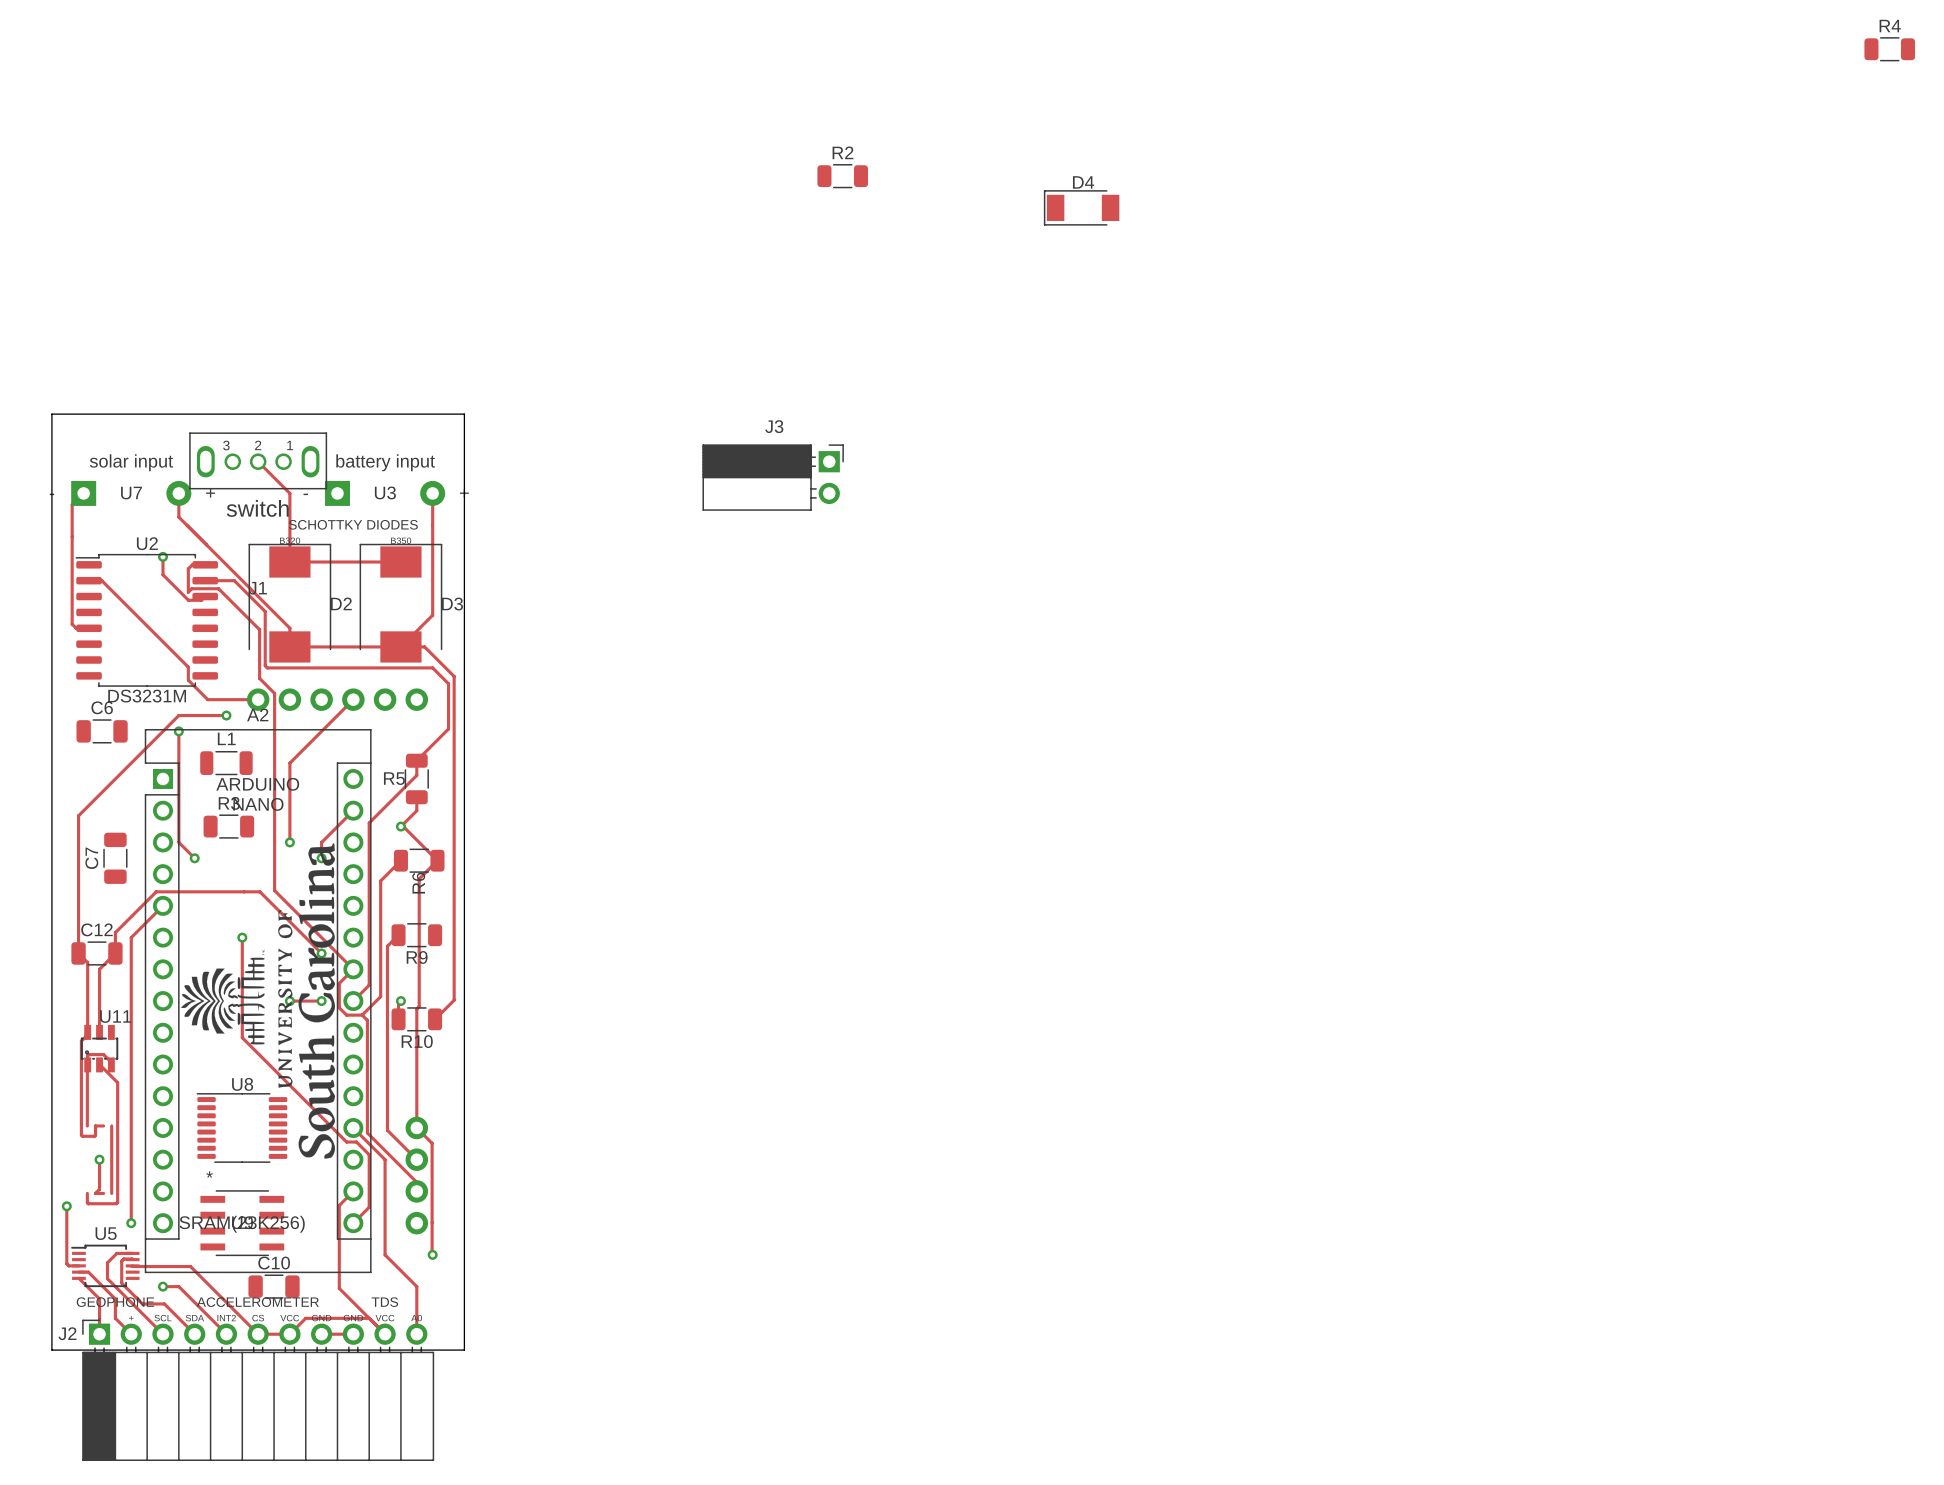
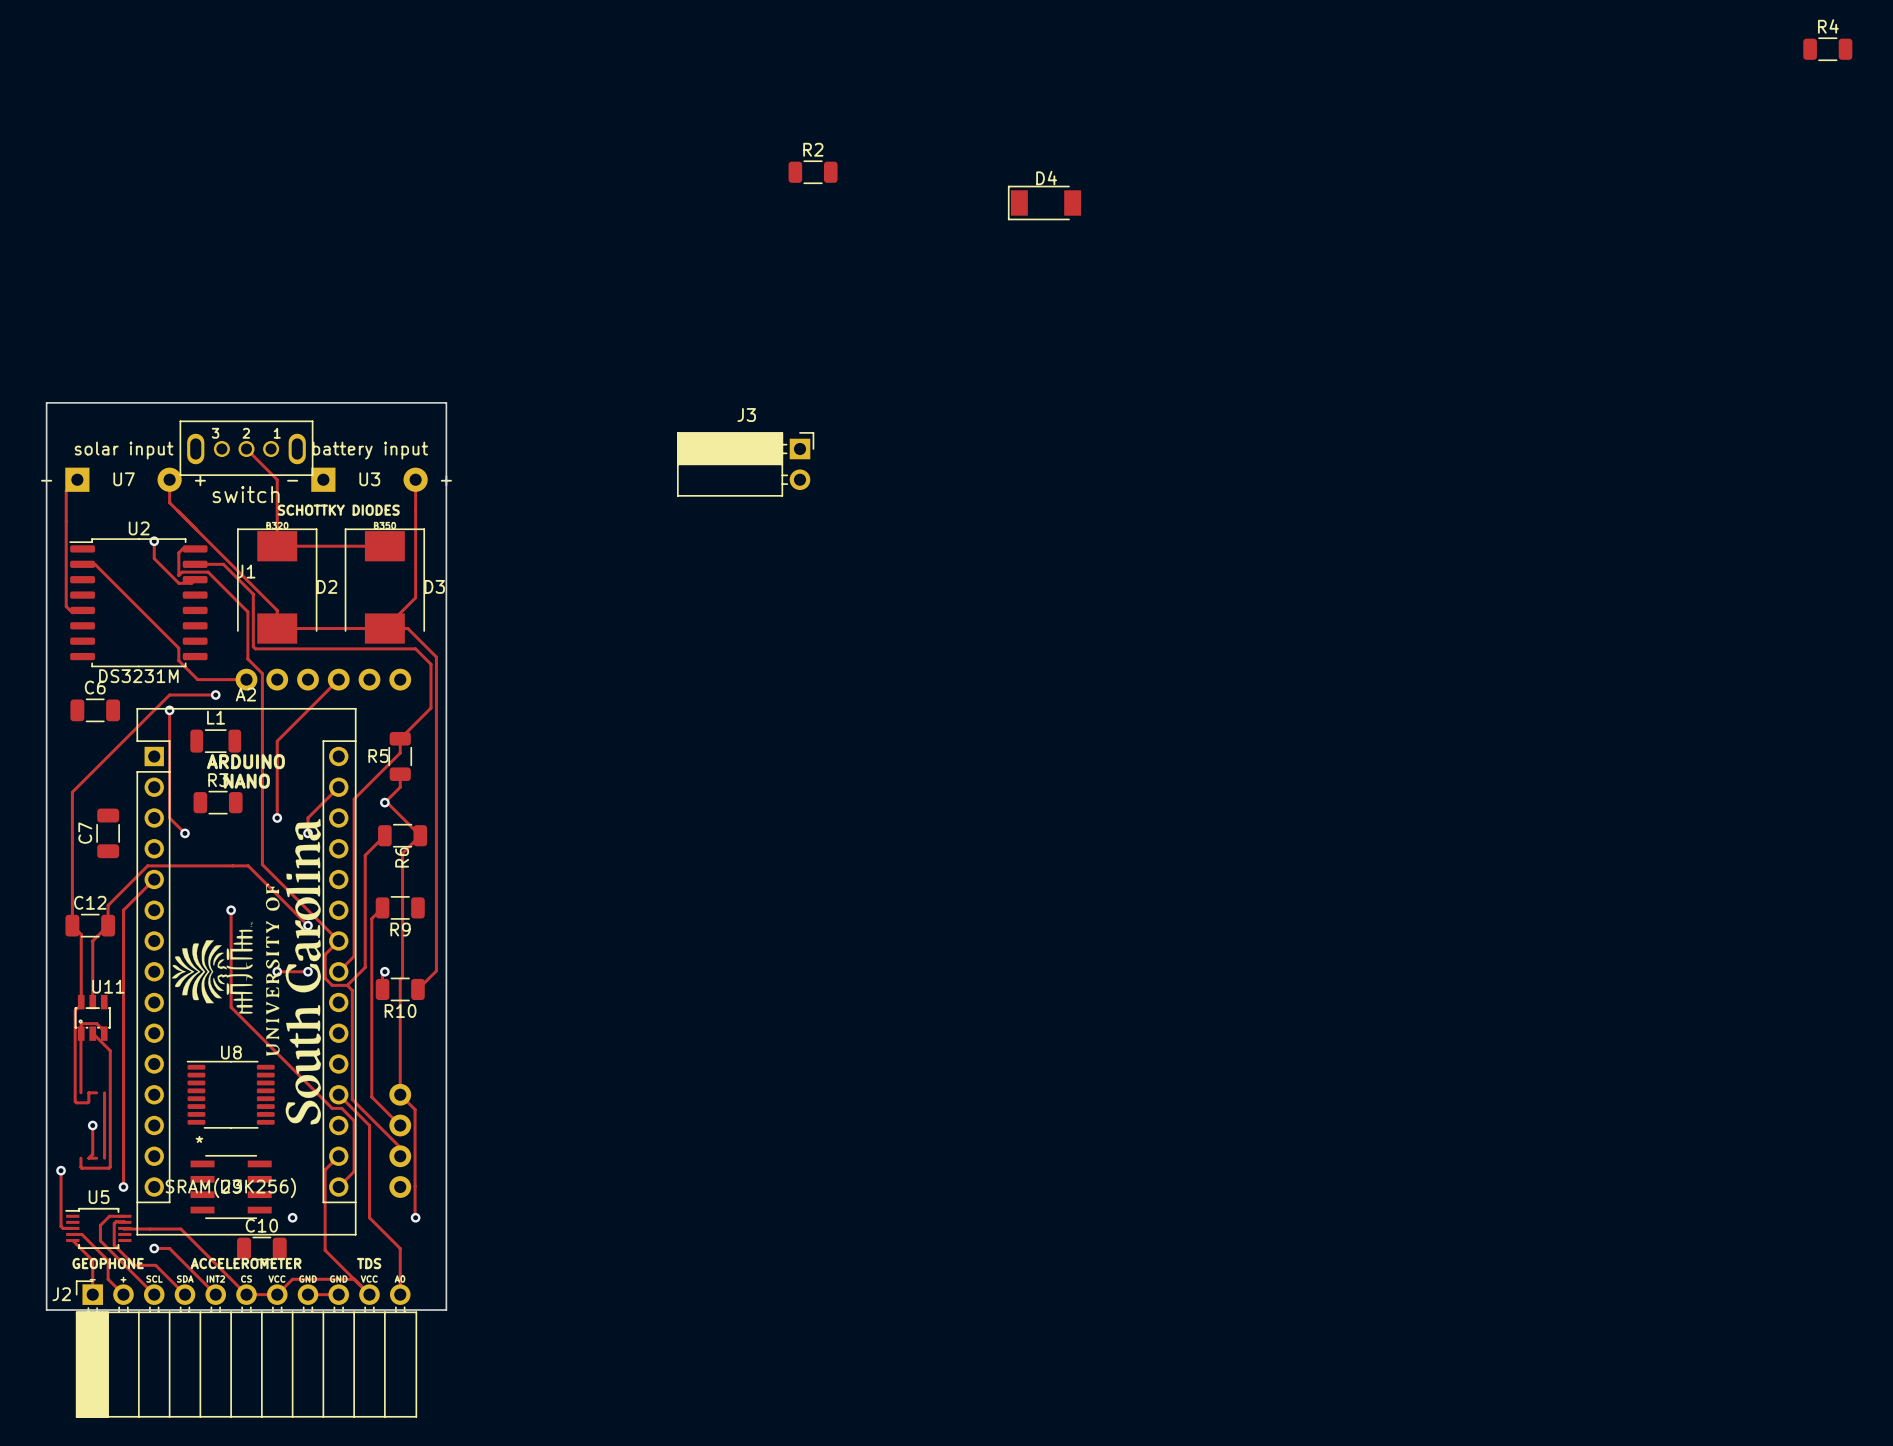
via: none -> (292, 1217)

